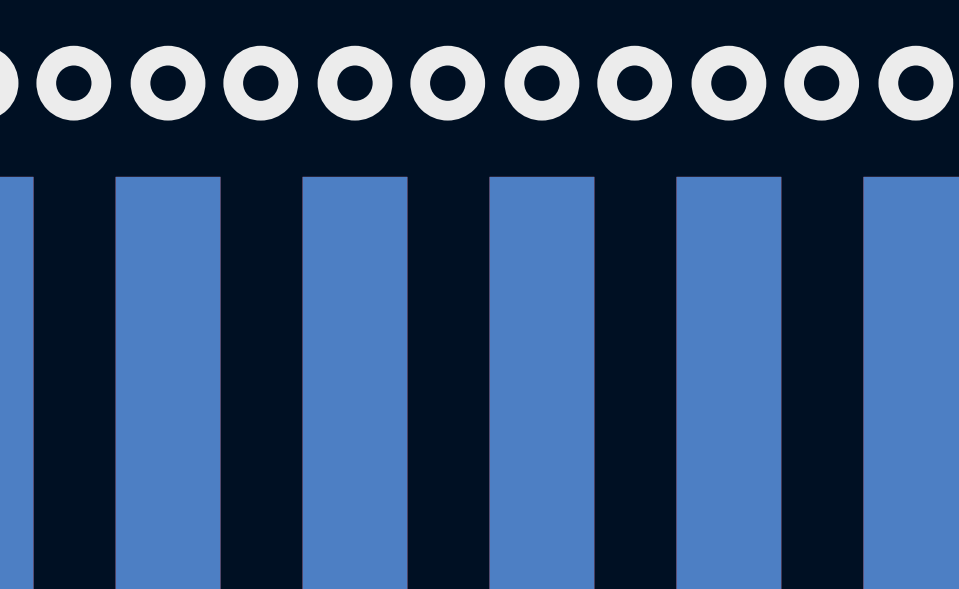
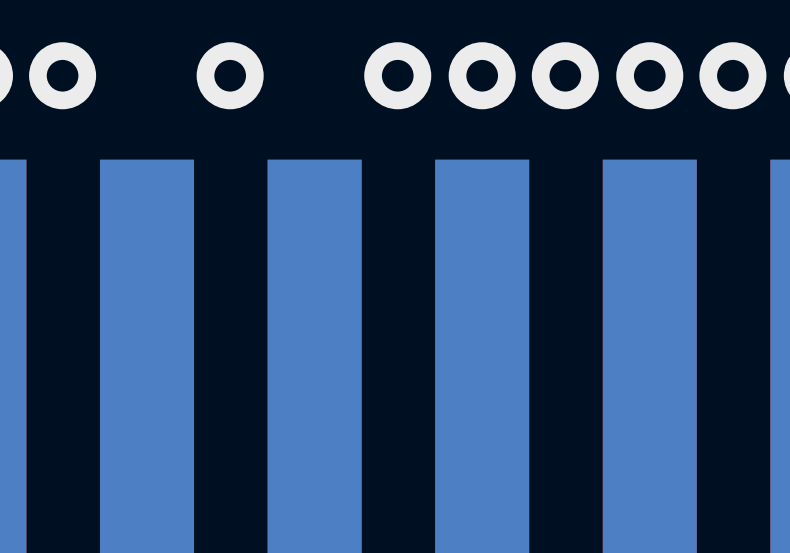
via: (168, 83) -> none
via: (354, 83) -> none

